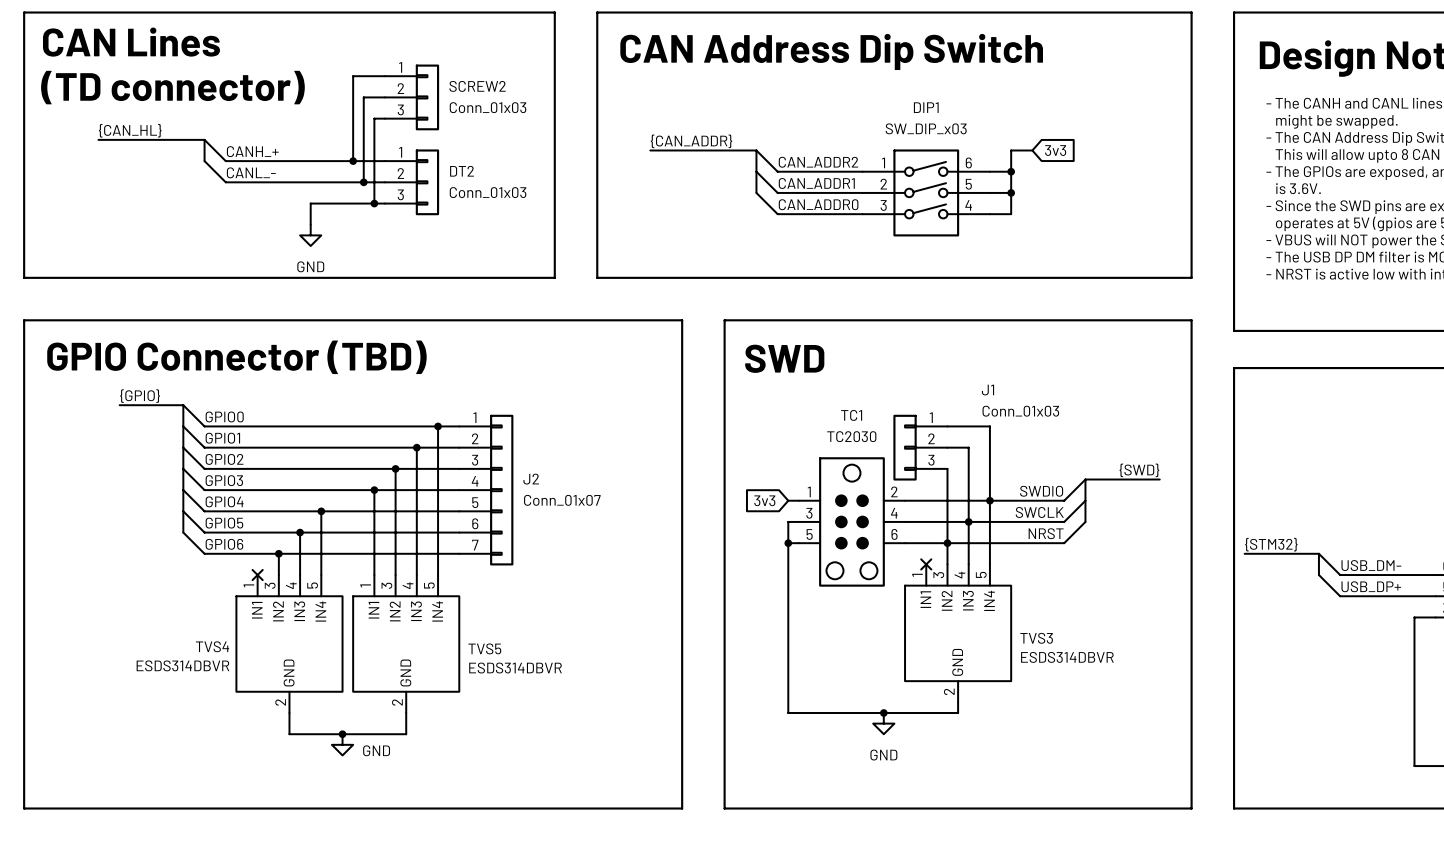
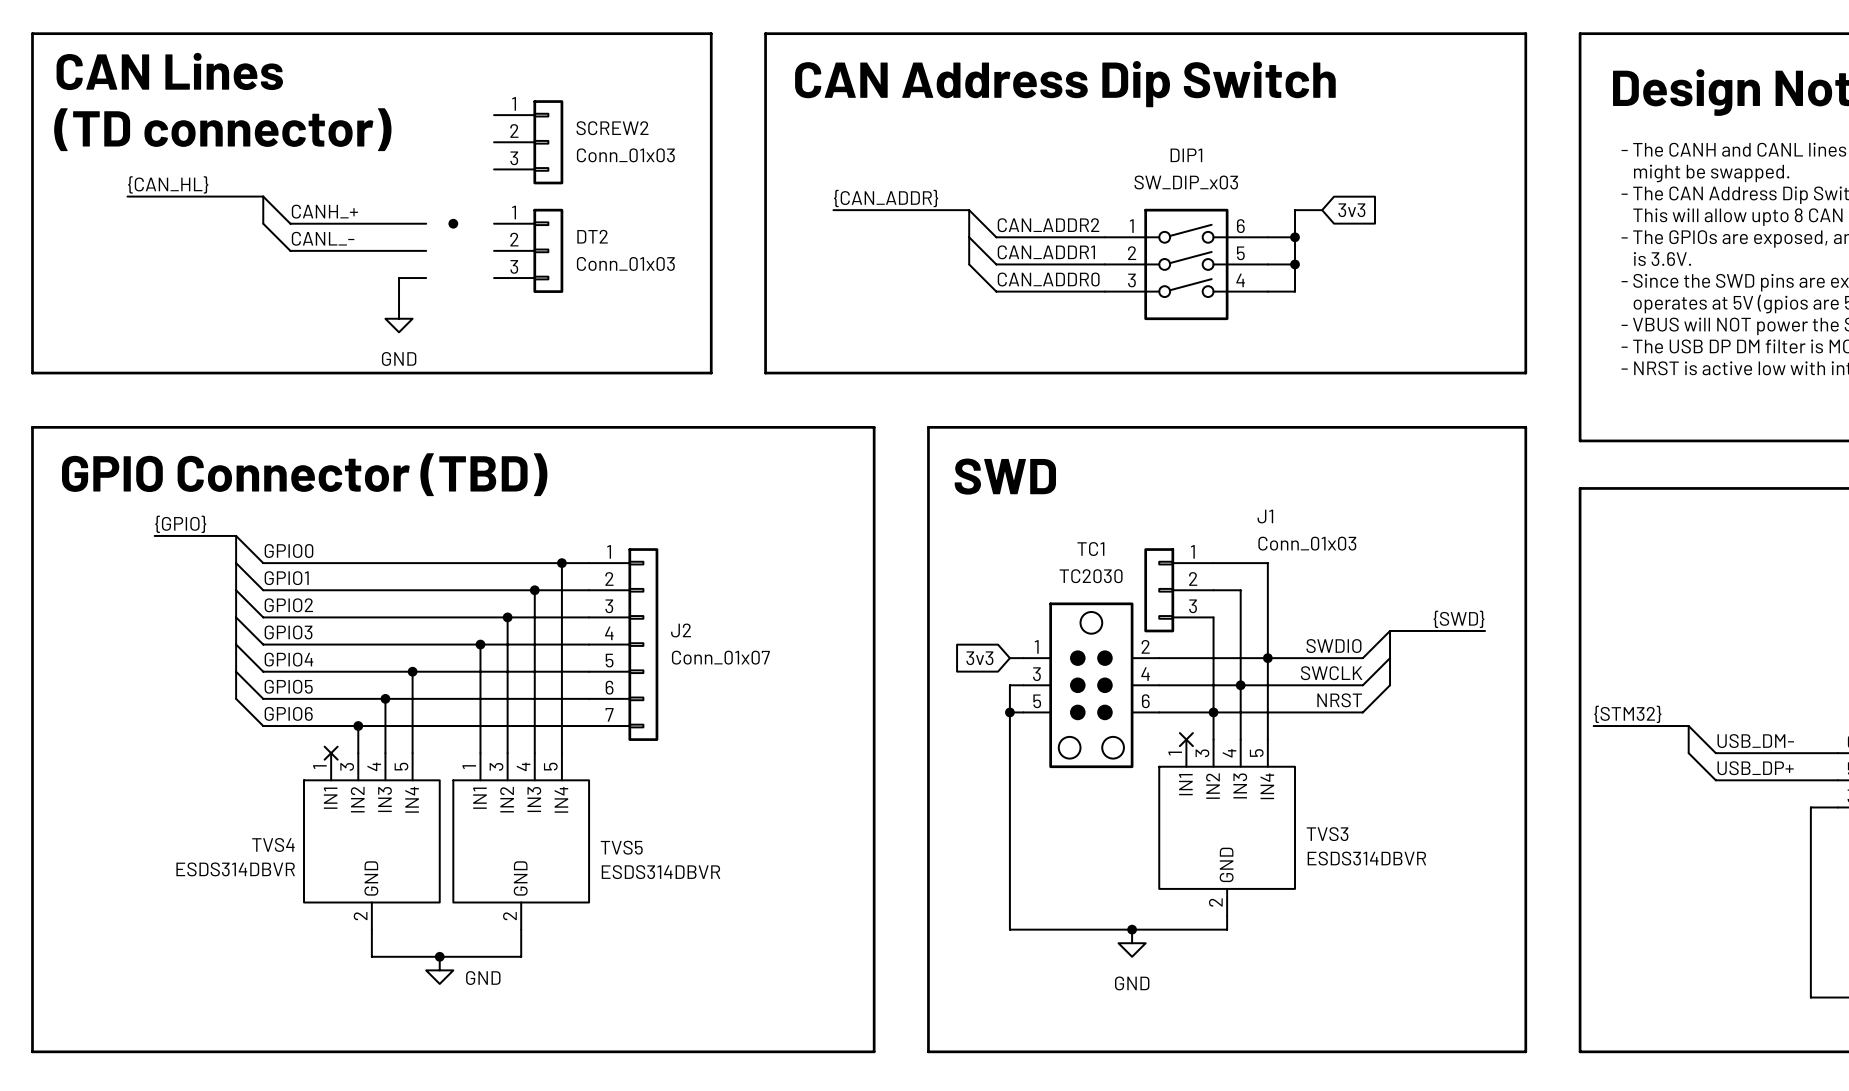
wire: (384, 76) (353, 76) (353, 161) -> none
wire: (384, 97) (363, 97) (363, 182) -> none
wire: (384, 118) (374, 118) (374, 203) -> none
wire: (331, 161) (384, 161) -> none
wire: (331, 182) (384, 182) -> none
junction: (363, 182) -> none
wire: (331, 203) (384, 203) -> none
junction: (374, 203) -> none

